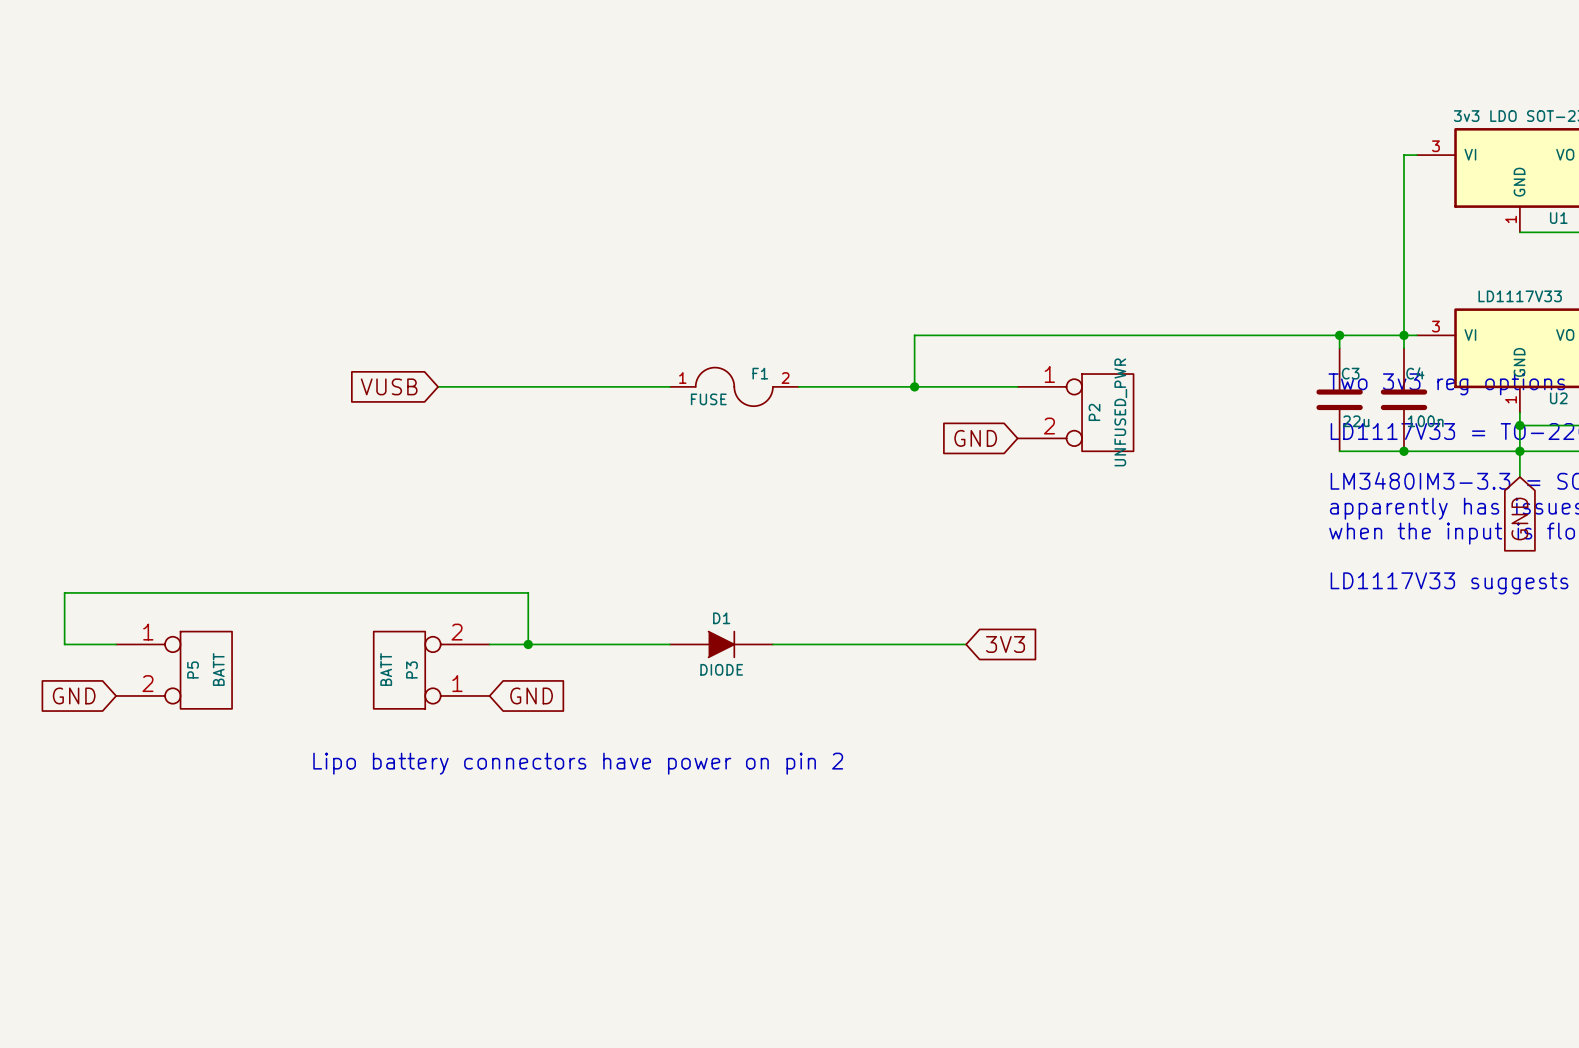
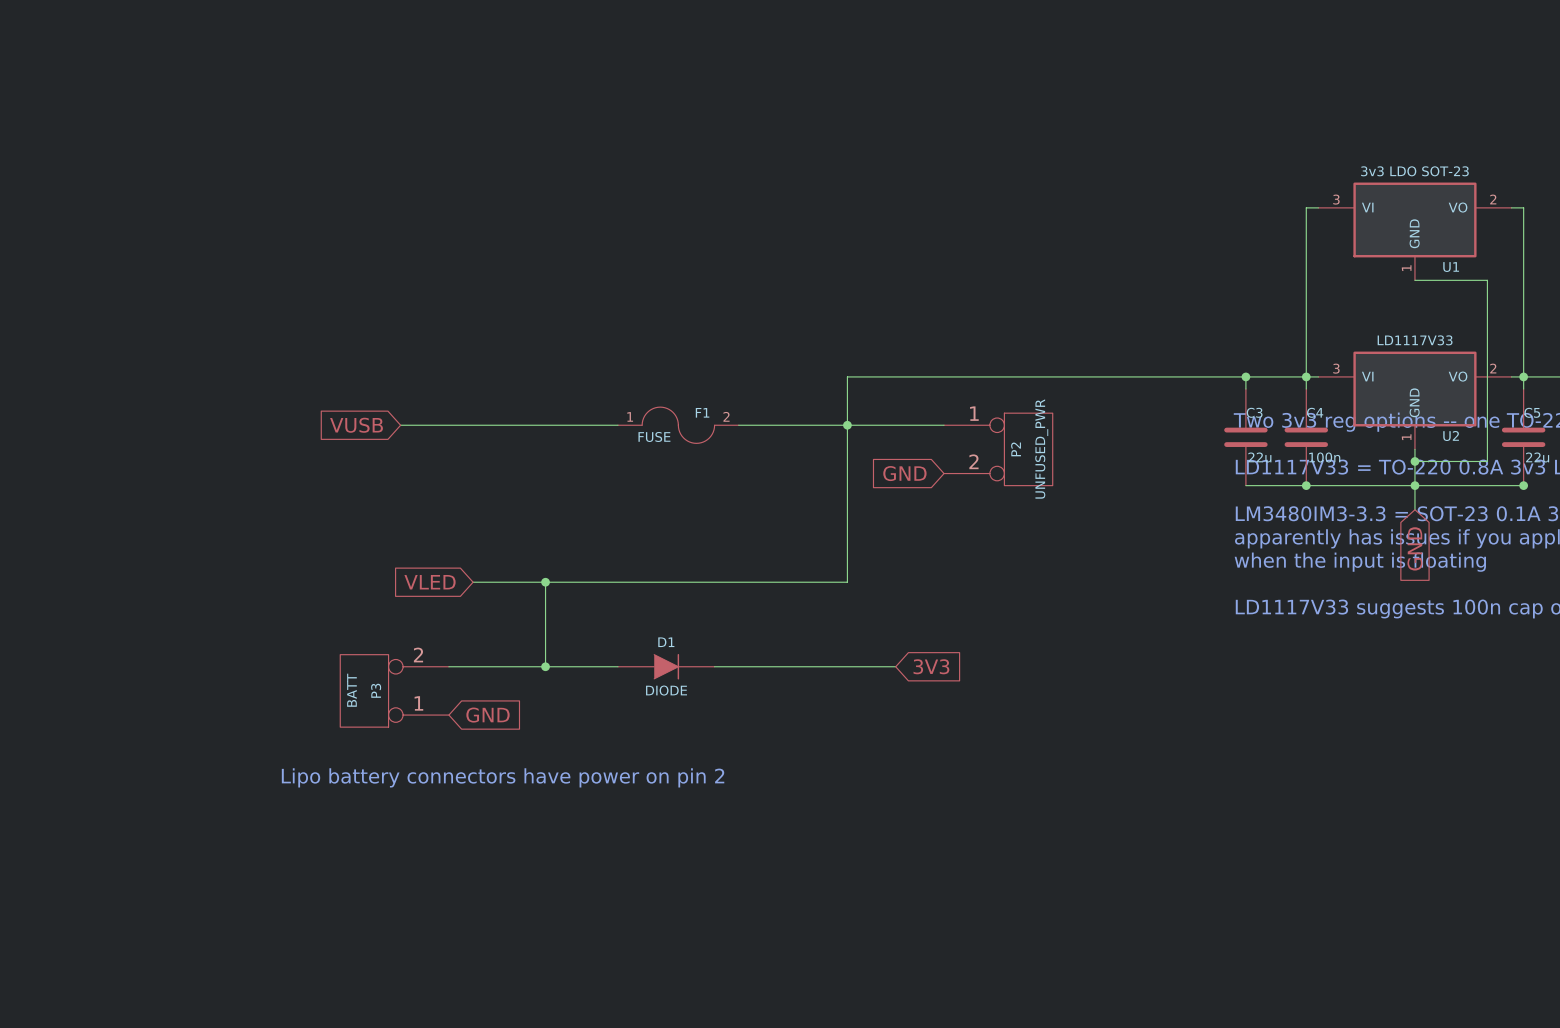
wire: none -> (847, 425) (847, 582) (473, 582)
global label: none -> VLED (430, 582)
wire: none -> (545, 582) (545, 666)
junction: none -> (545, 582)
wire: (116, 644) (64, 644) (64, 592) (528, 592) (528, 644) -> none
junction: (528, 644) -> none
junction: none -> (545, 666)
P5: BATT (174, 670) -> none
global label: GND (74, 695) -> none

